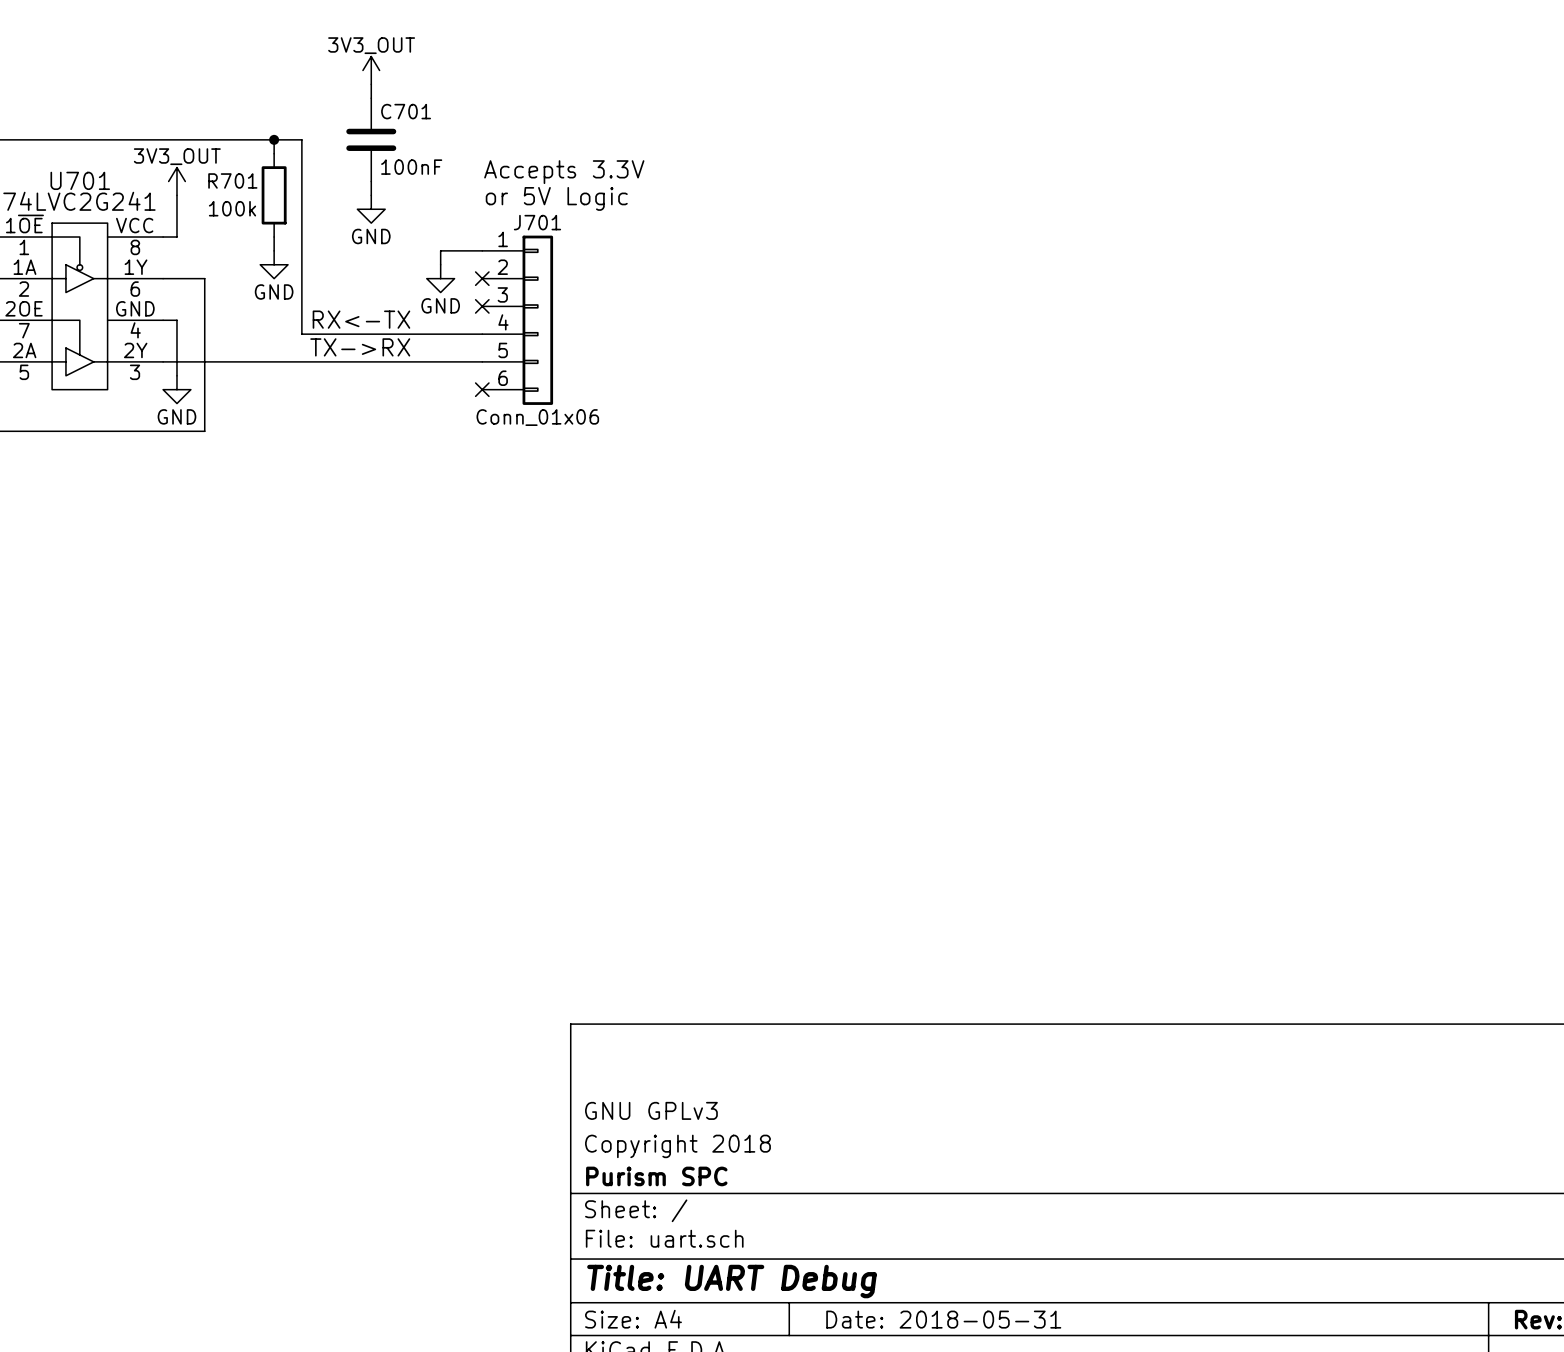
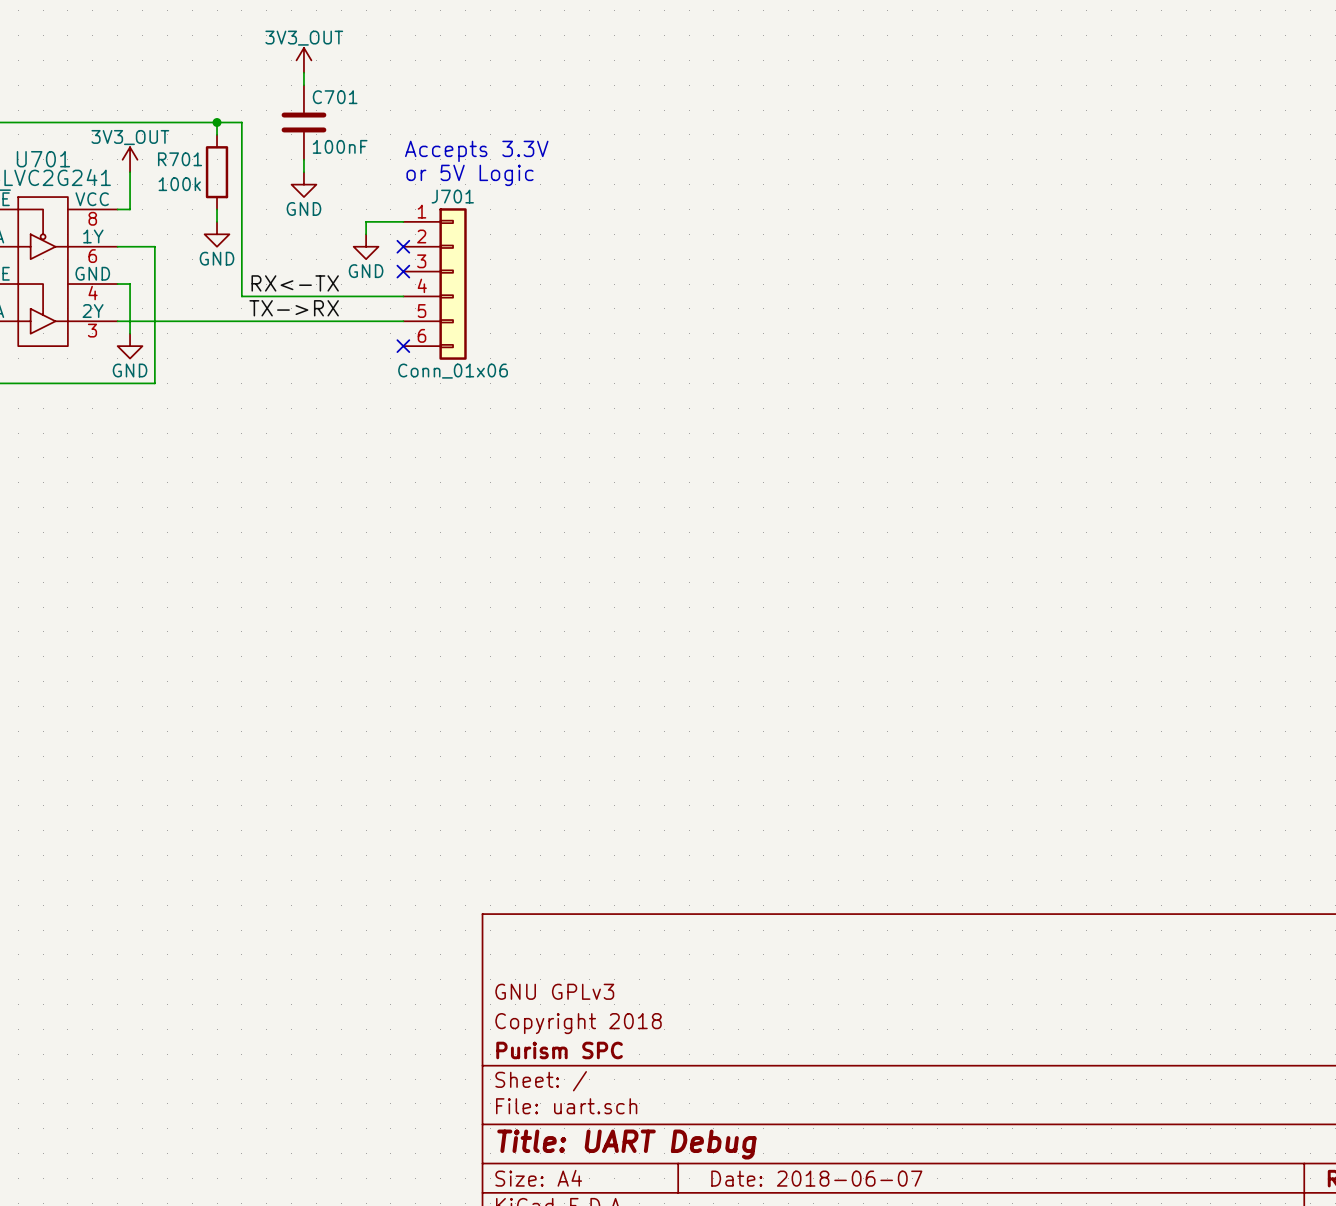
title block: Date: 2018-05-31 (943, 1319) -> Date: 2018-06-07 (816, 1178)

